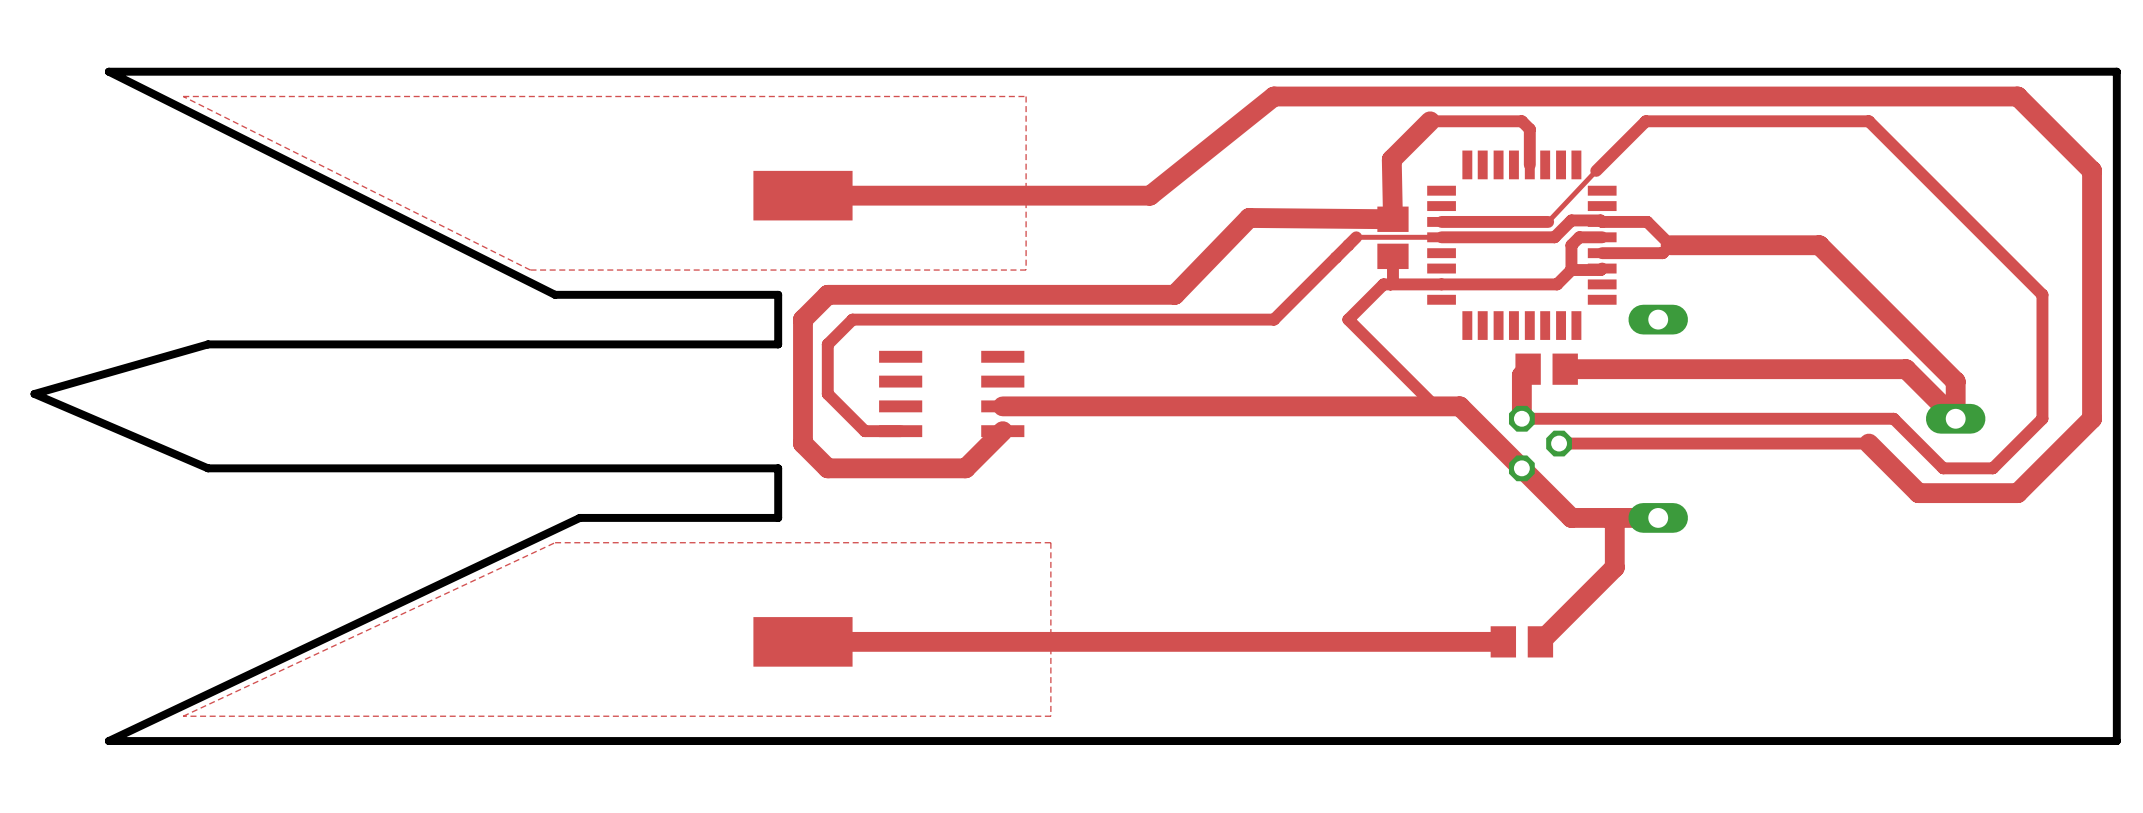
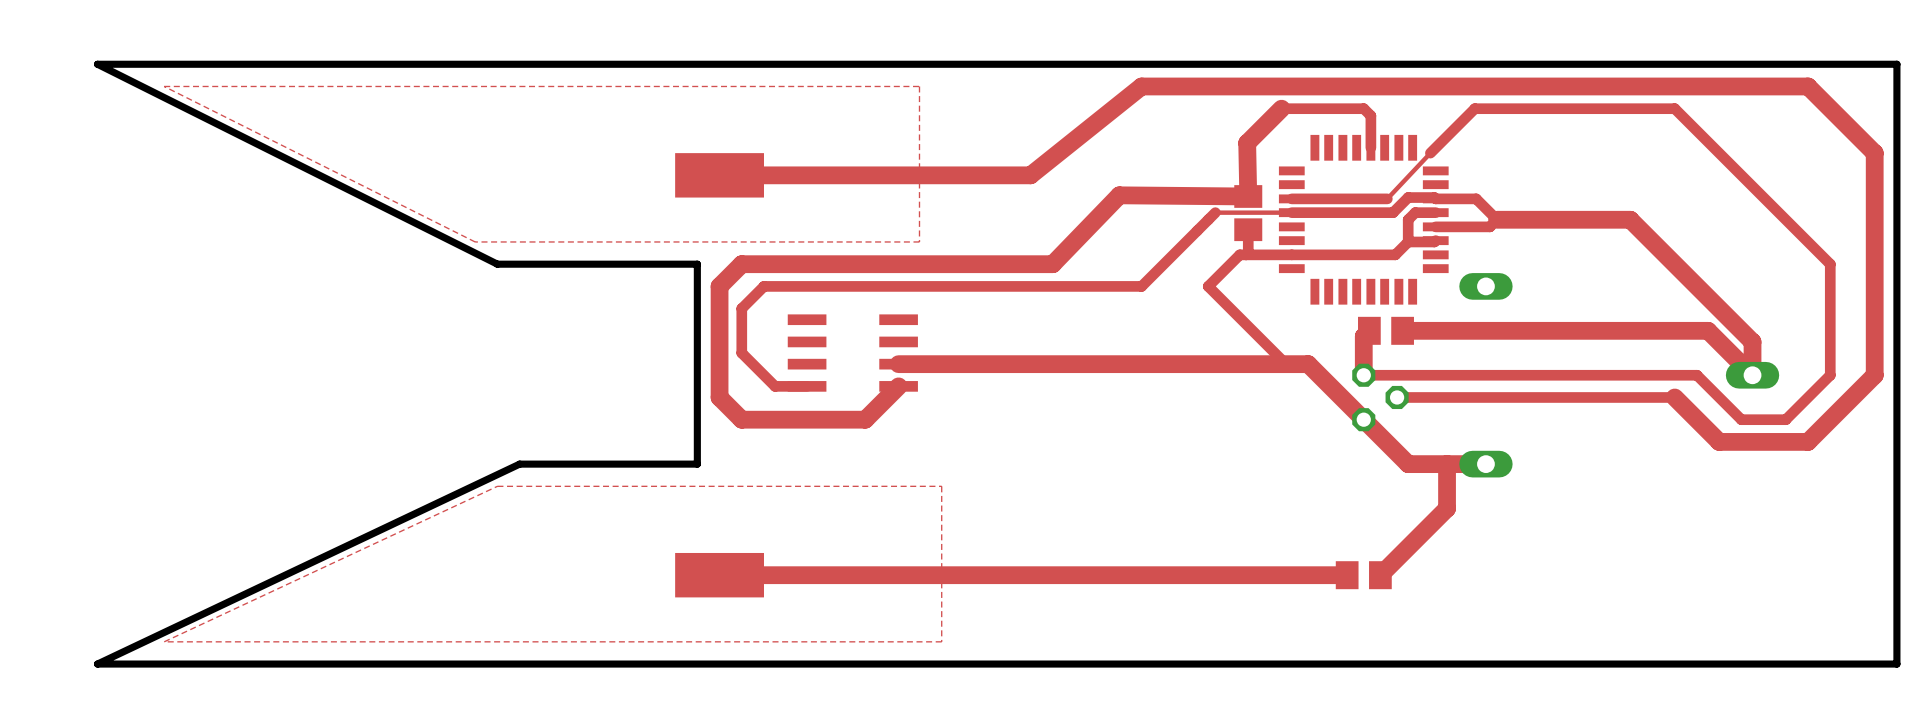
board edge: (778, 344) (208, 344) (34, 393) (208, 468) (778, 468) -> (697, 308) (697, 419)

